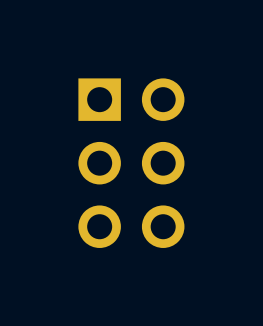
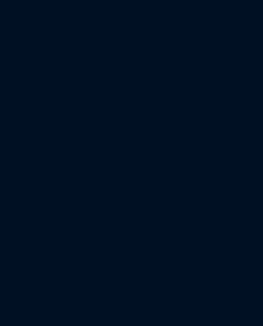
part: (131, 163) -> none

